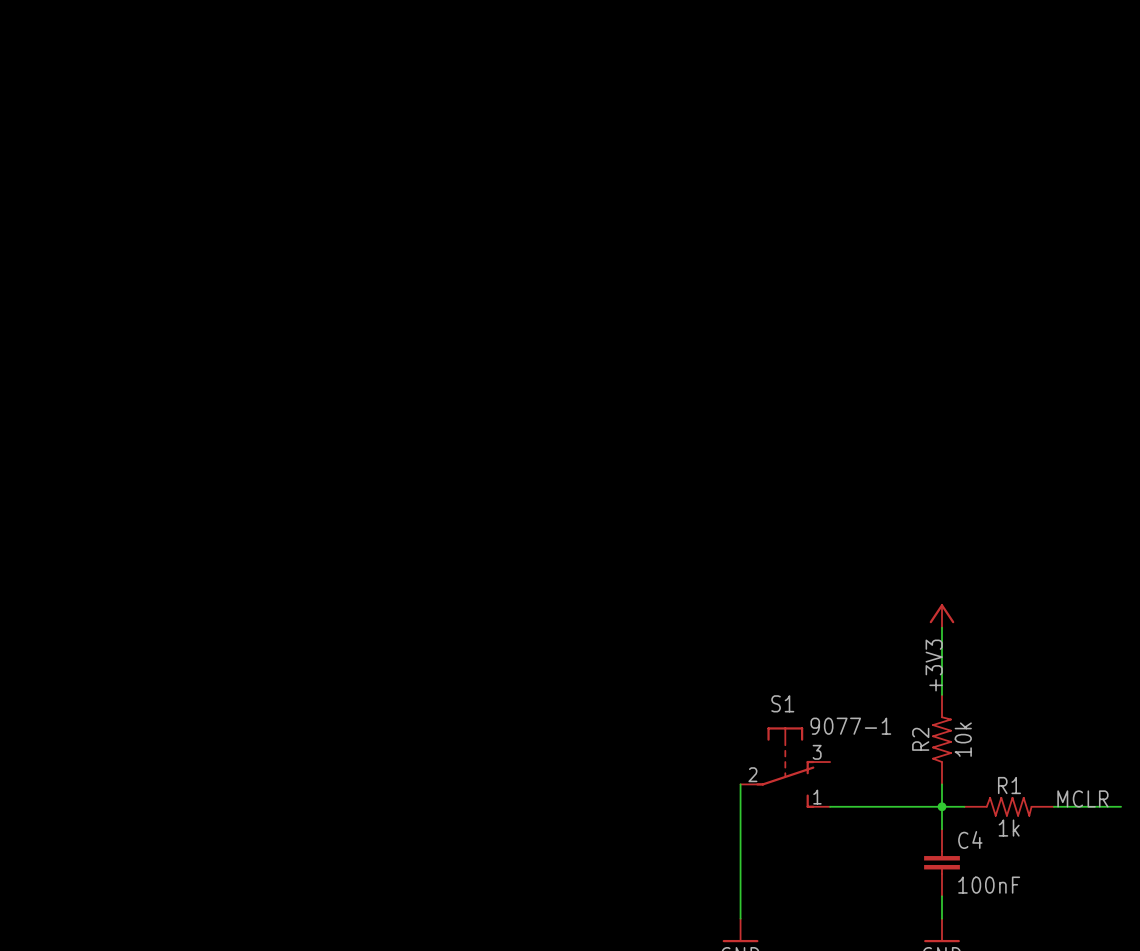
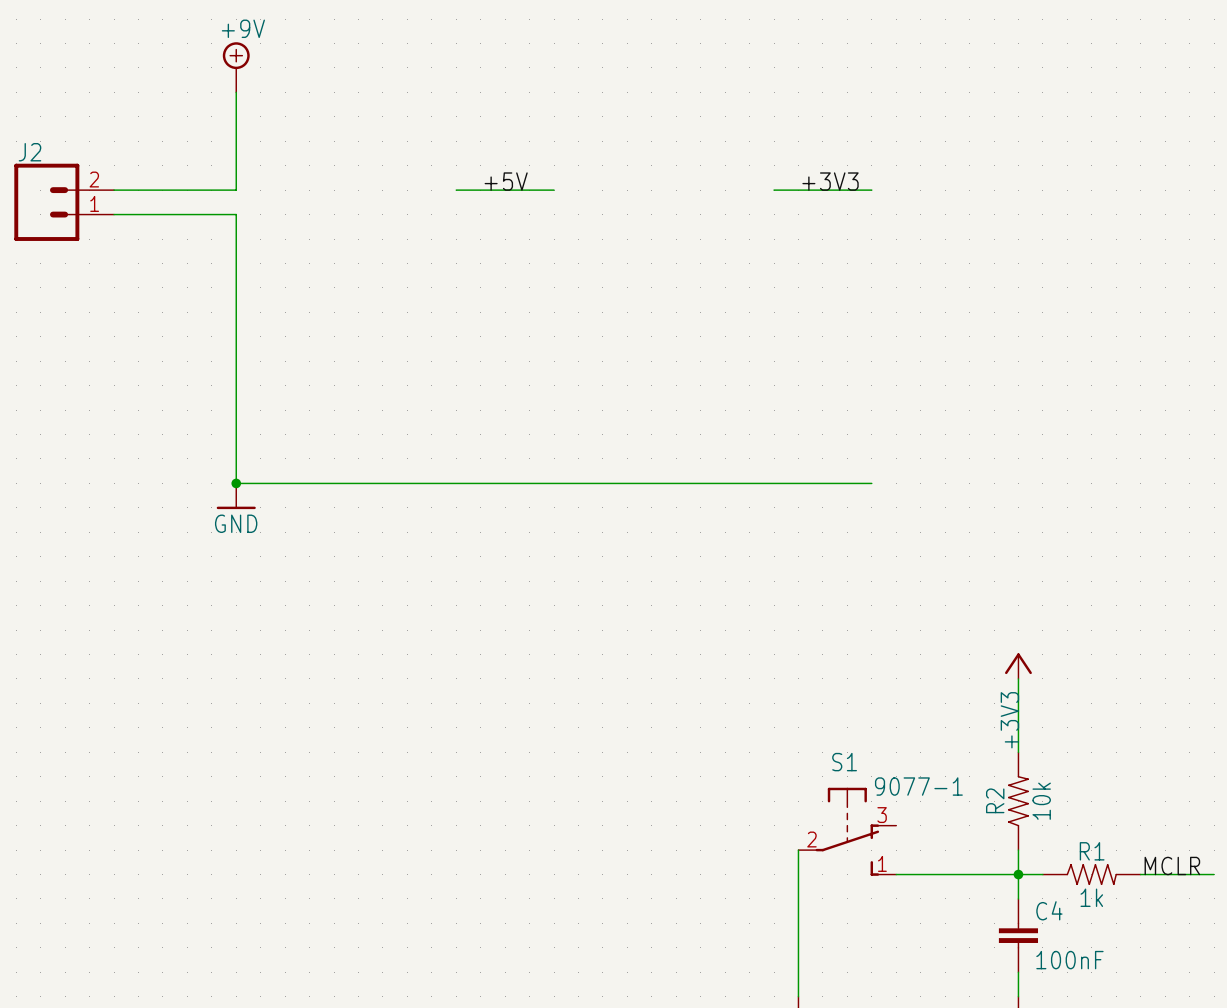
power symbol: none -> +9V (236, 67)
wire: none -> (236, 92) (236, 190) (114, 190)
label: none -> +5V (506, 181)
label: none -> +3V3 (830, 181)
wire: none -> (456, 190) (554, 190)
wire: none -> (774, 190) (871, 190)
J2: none -> (64, 202)
wire: none -> (114, 214) (236, 214) (236, 483) (871, 483)
junction: none -> (236, 483)
power symbol: none -> GND (236, 496)

